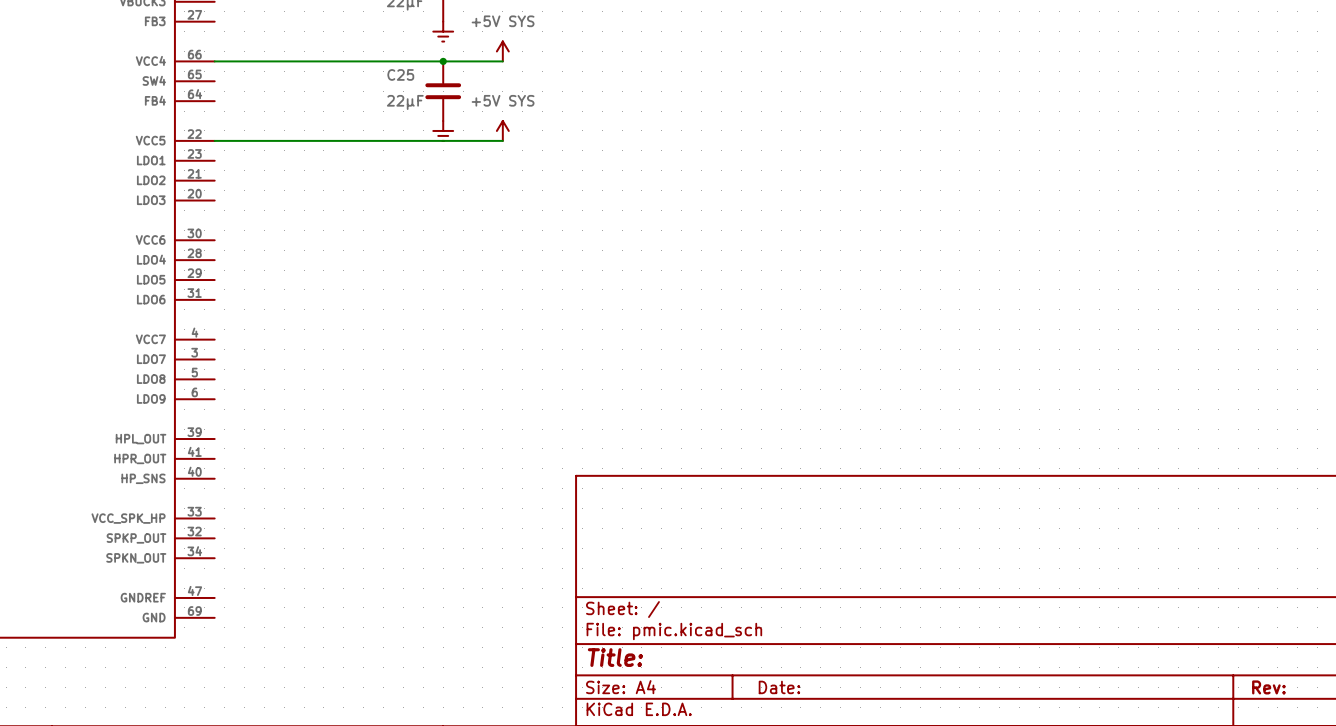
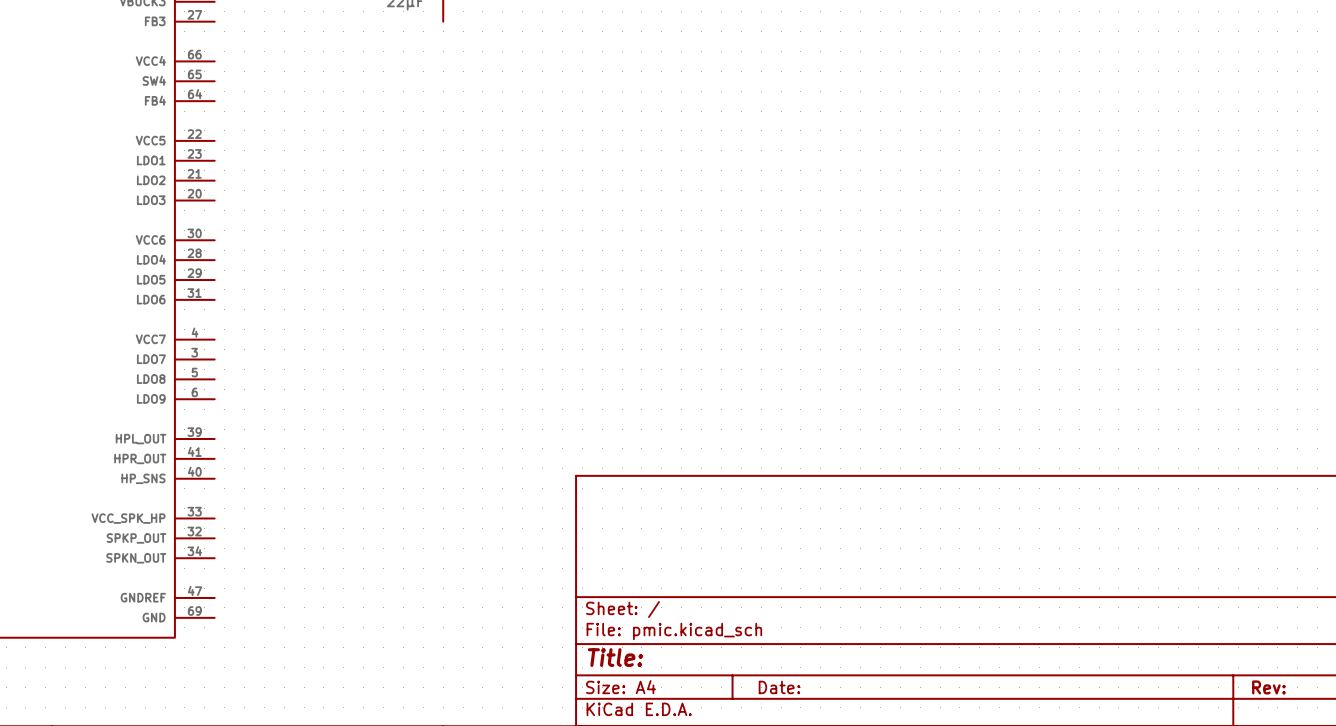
power symbol: (443, 31) -> none
power symbol: +5V SYS (502, 51) -> none
wire: (214, 61) (502, 61) -> none
junction: (443, 61) -> none
C25: 22µF (443, 91) -> none
power symbol: (443, 130) -> none
power symbol: +5V SYS (502, 130) -> none
wire: (214, 140) (502, 140) -> none

